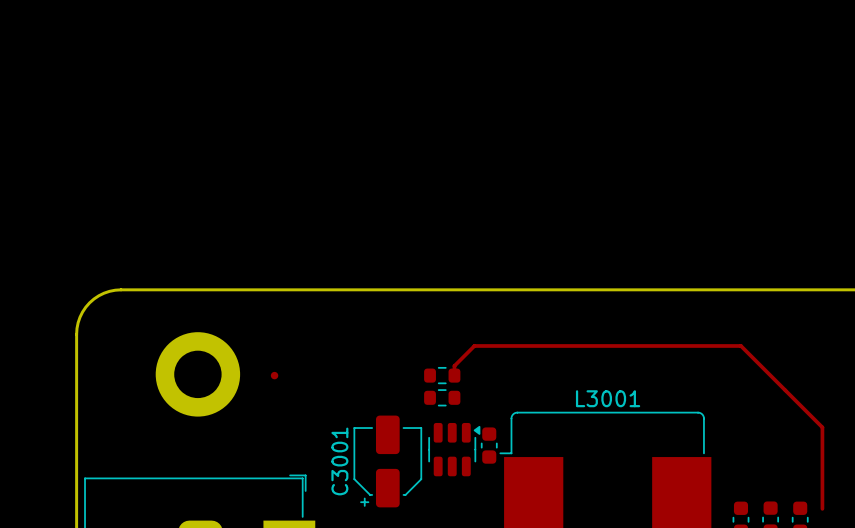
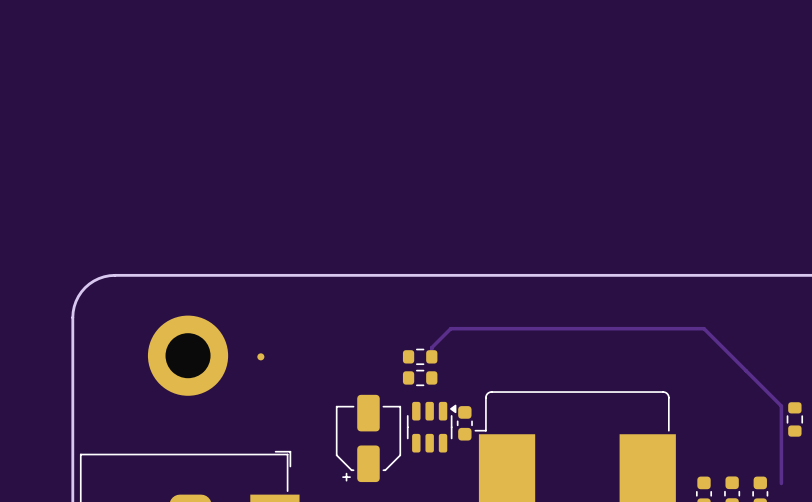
L3001 name: L3001 (608, 398) -> none
part: none -> (794, 419)
C3001 name: C3001 (339, 461) -> none

